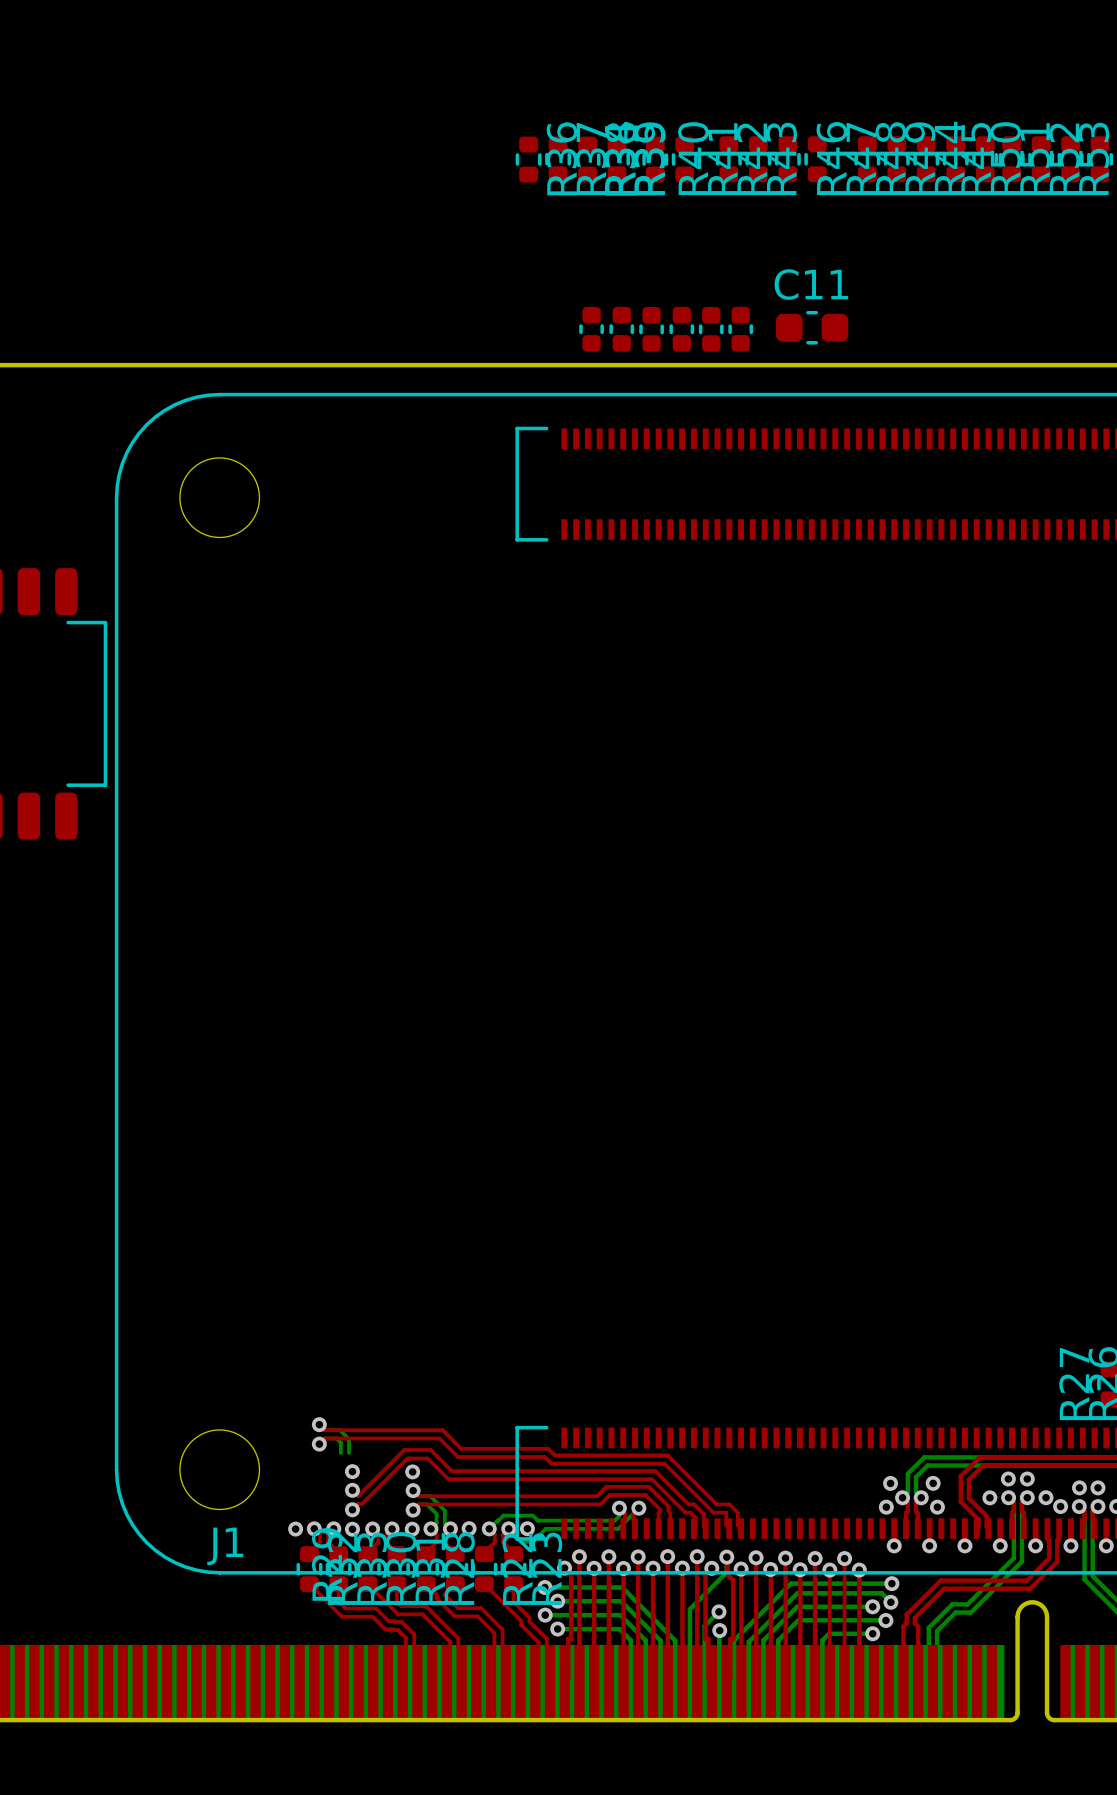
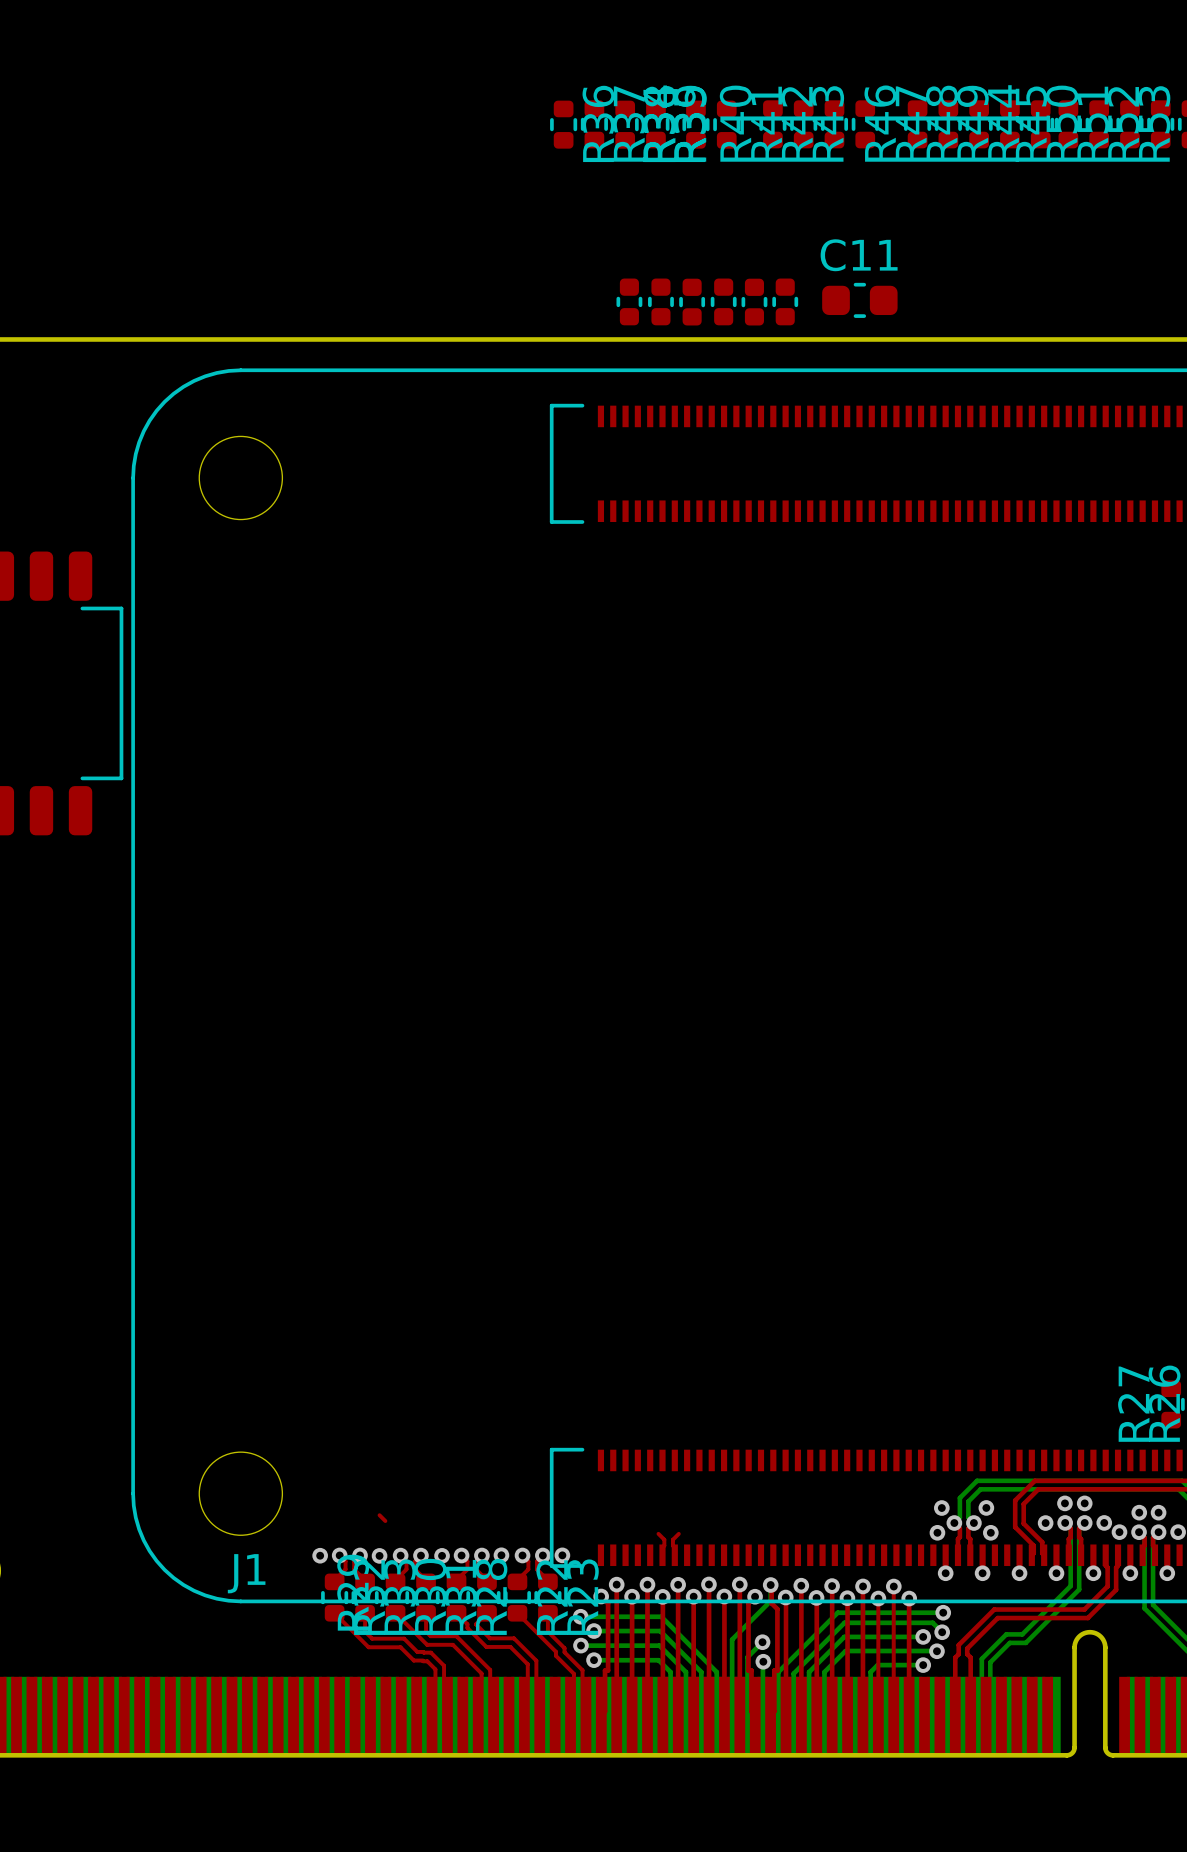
top track: (319, 1424) (324, 1430) (442, 1430) (461, 1448) (548, 1448) (554, 1455) (667, 1455) (716, 1504) (729, 1504) (737, 1512) (737, 1525) (741, 1528) -> none
bottom track: (319, 1424) (324, 1430) (340, 1430) (349, 1439) (349, 1452) -> none
via: (319, 1424) -> none
top track: (319, 1444) (324, 1438) (439, 1438) (457, 1457) (544, 1457) (551, 1463) (664, 1463) (713, 1512) (726, 1512) (726, 1525) (729, 1528) -> none
bottom track: (319, 1444) (324, 1438) (336, 1438) (340, 1442) (340, 1452) -> none
via: (319, 1444) -> none
top track: (408, 1458) (427, 1458) (448, 1479) (652, 1479) (685, 1512) (690, 1512) (695, 1517) (693, 1528) -> none
top track: (408, 1458) (361, 1504) (358, 1504) (352, 1509) -> none
via: (352, 1471) -> none
via: (412, 1471) -> none
via: (352, 1490) -> none
top track: (413, 1490) (418, 1496) (597, 1496) (606, 1486) (649, 1486) (668, 1506) (670, 1528) -> none
bottom track: (413, 1490) (418, 1496) (430, 1496) (444, 1510) (444, 1523) (450, 1528) -> none
via: (413, 1490) -> none
top track: (358, 1495) (404, 1449) (430, 1449) (451, 1471) (655, 1471) (688, 1504) (694, 1504) (703, 1514) (703, 1526) (705, 1528) -> none
bottom track: (619, 1508) (619, 1515) (614, 1520) (537, 1520) (532, 1515) (503, 1515) (489, 1528) -> none
via: (619, 1508) -> none
bottom track: (638, 1508) (618, 1528) (545, 1528) (532, 1541) (522, 1541) (514, 1534) (514, 1528) (508, 1528) -> none
via: (638, 1508) -> none
via: (352, 1509) -> none
top track: (413, 1510) (418, 1504) (600, 1504) (609, 1495) (645, 1495) (660, 1509) (658, 1528) -> none
bottom track: (413, 1510) (418, 1504) (427, 1504) (436, 1513) (436, 1523) (430, 1528) -> none
via: (413, 1510) -> none

